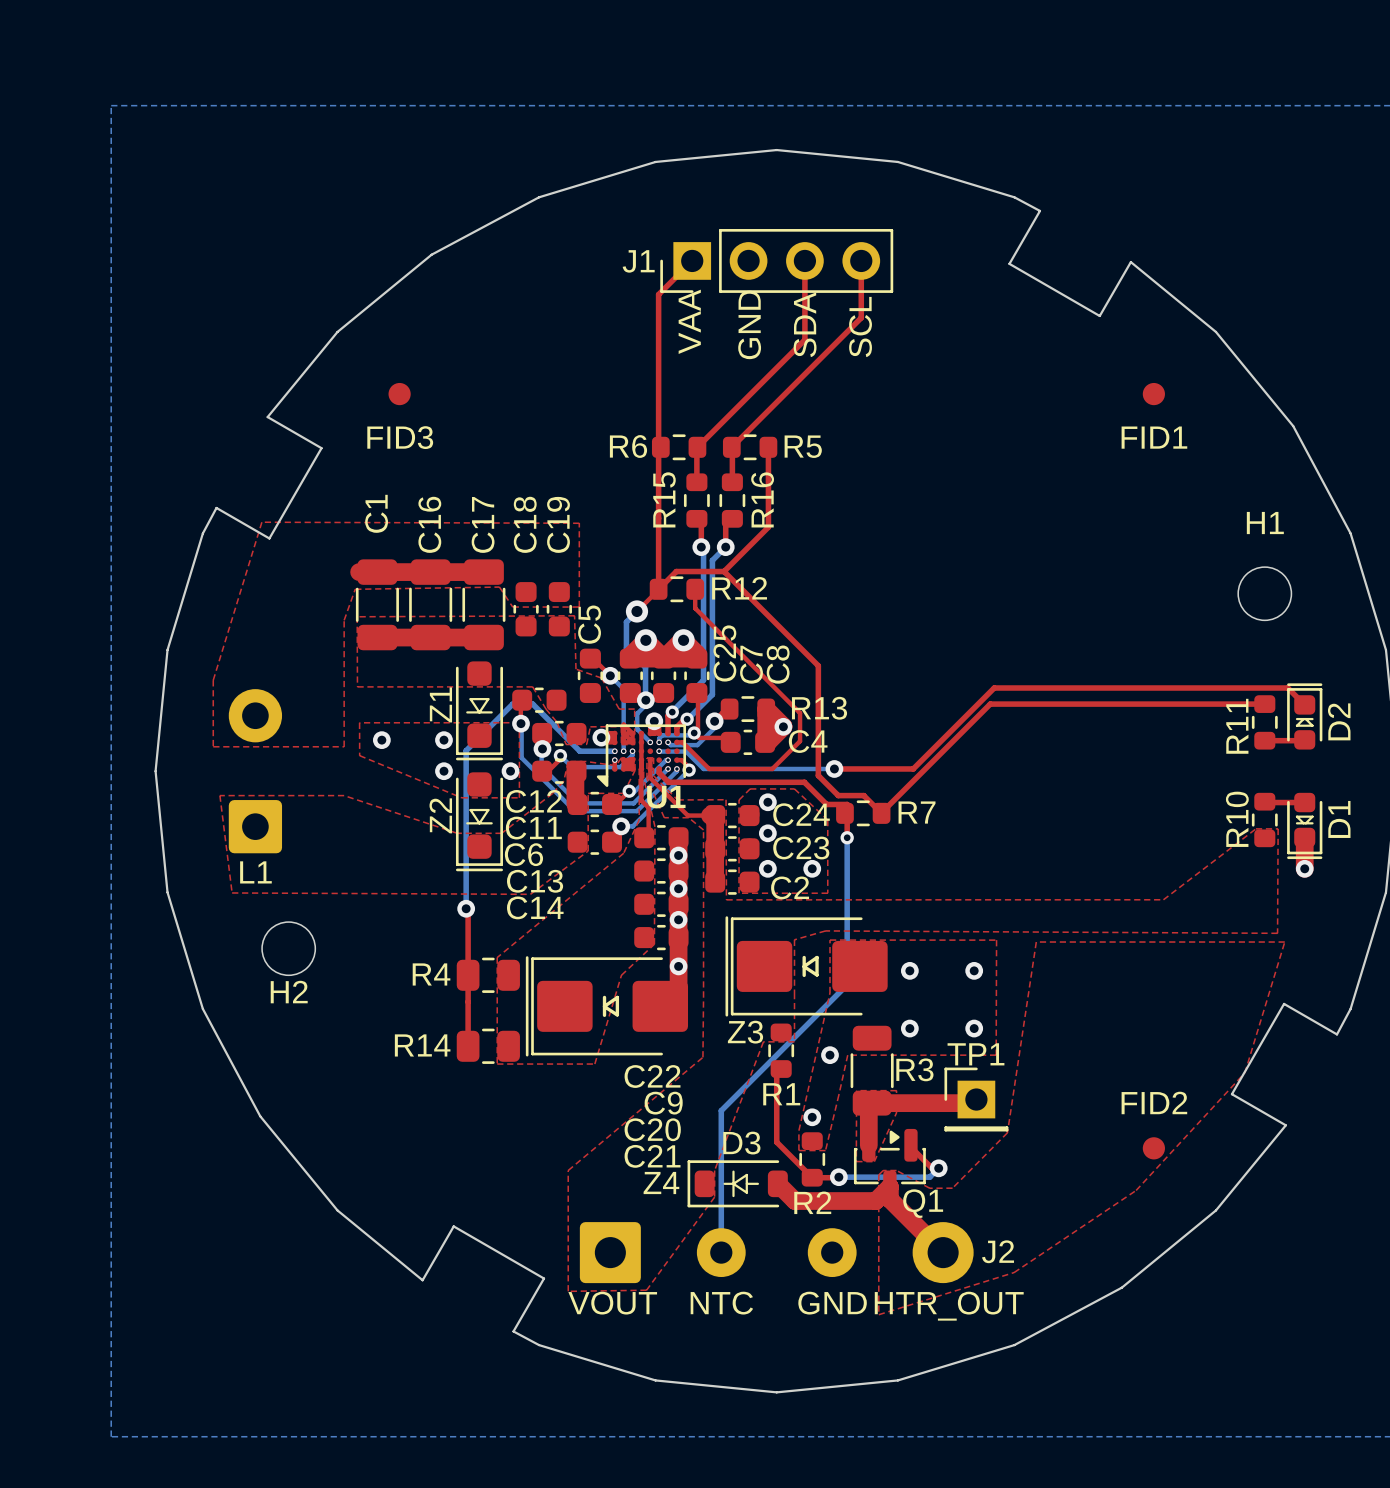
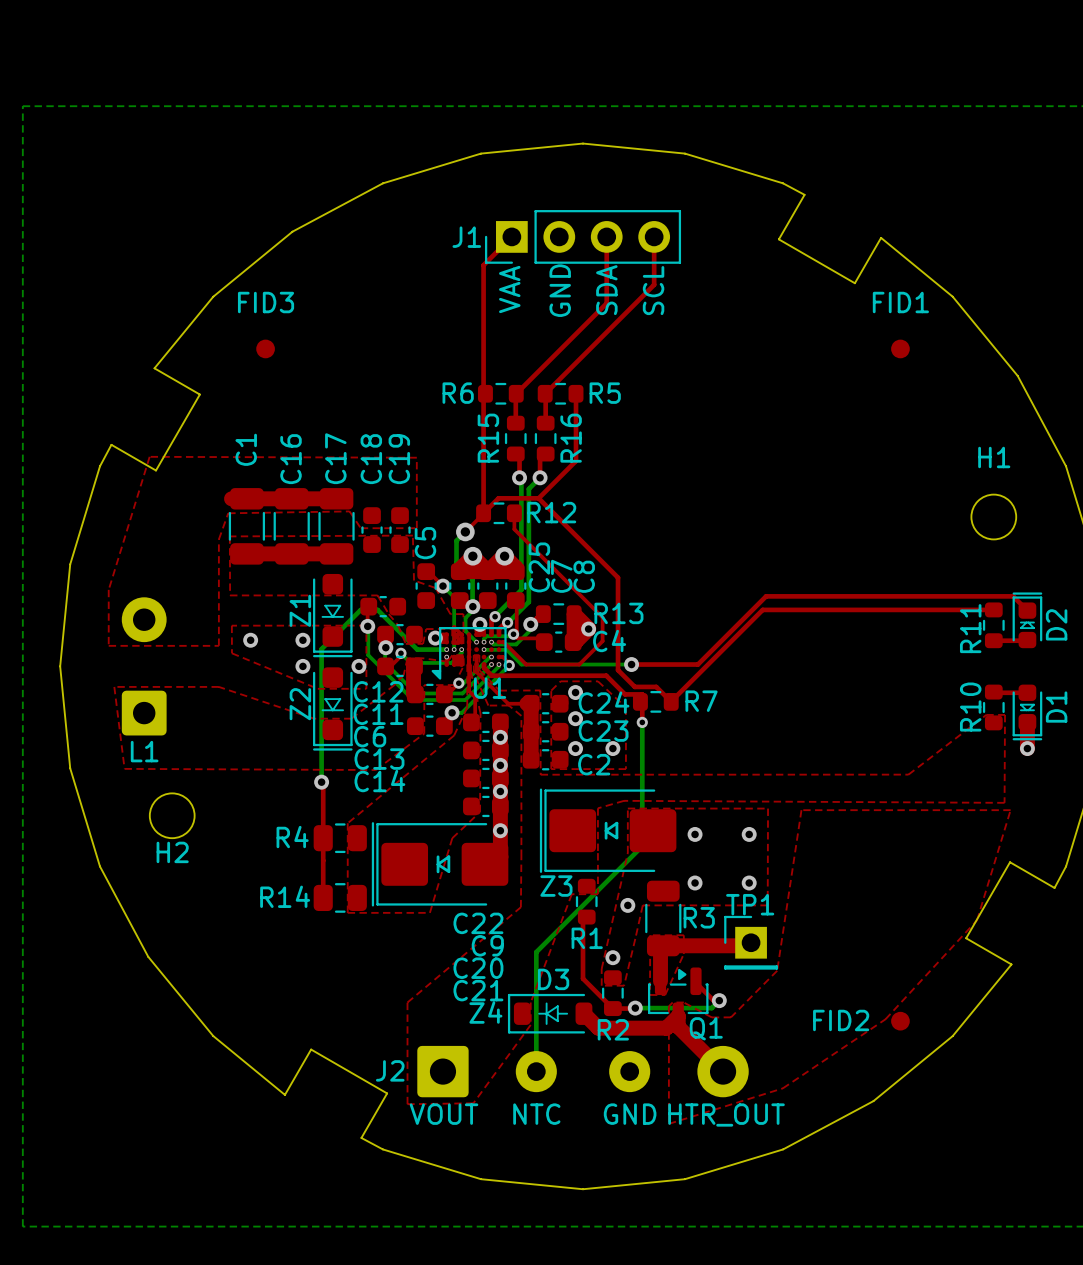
FID3 name position: FID3 (400, 437) -> FID3 (266, 302)
FID1 name position: FID1 (1154, 437) -> FID1 (900, 302)
FID2 name position: FID2 (1154, 1102) -> FID2 (841, 1020)
FID2 position: (1153, 1148) -> (900, 1021)
J2 name position: J2 (998, 1251) -> J2 (390, 1070)

